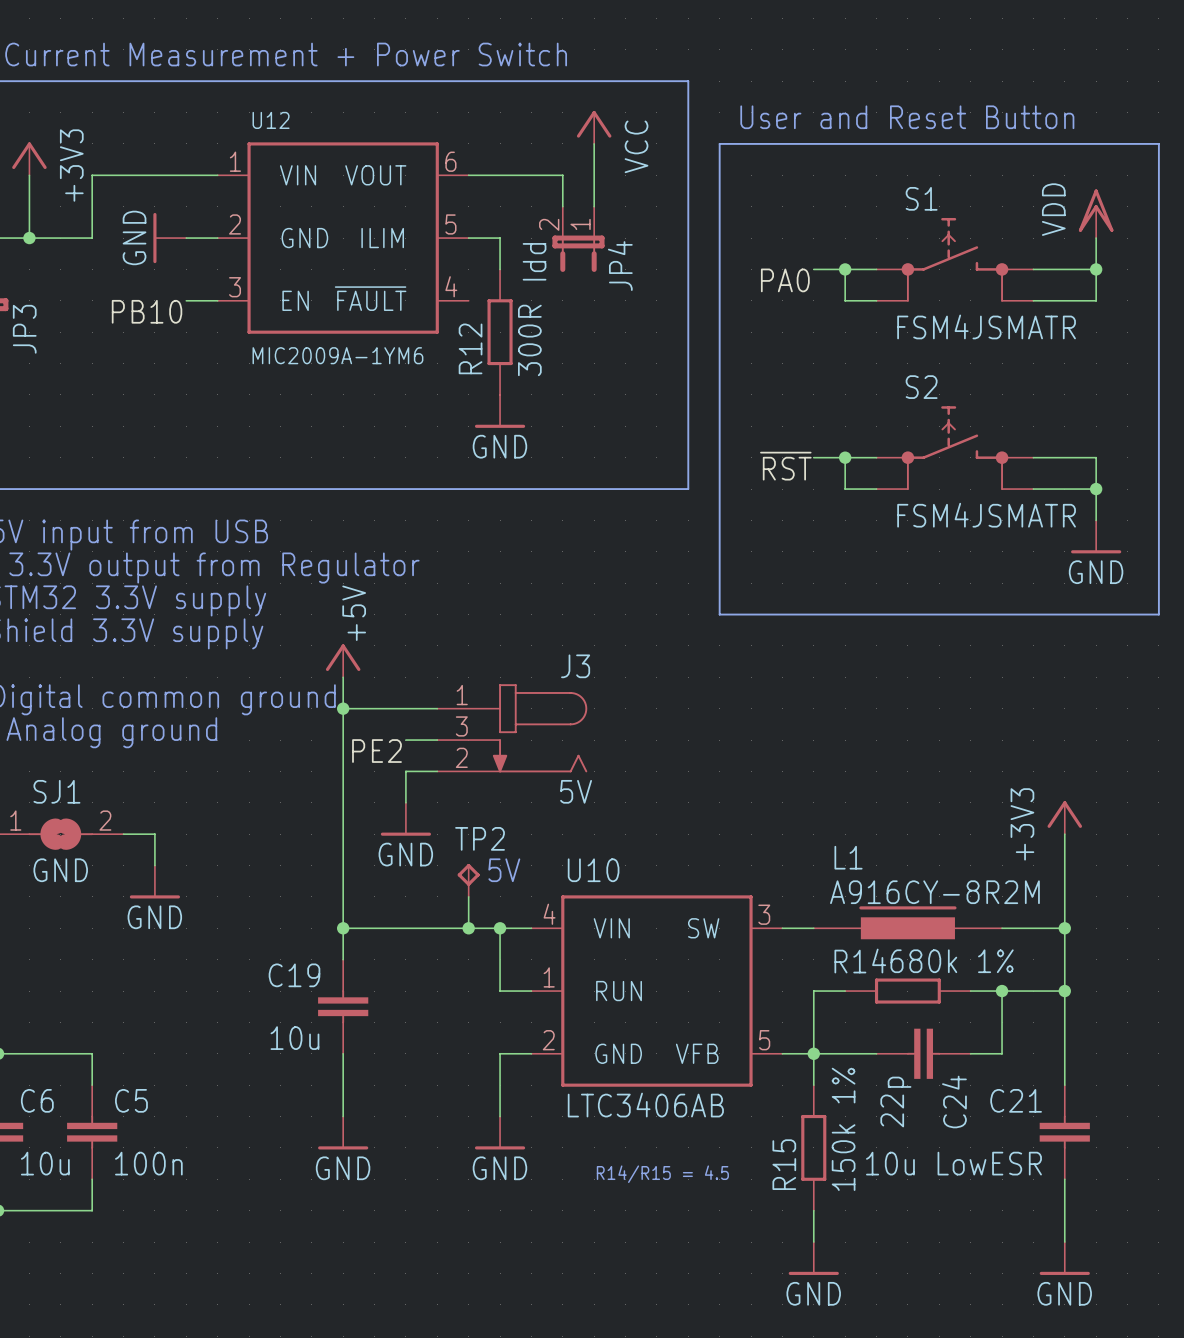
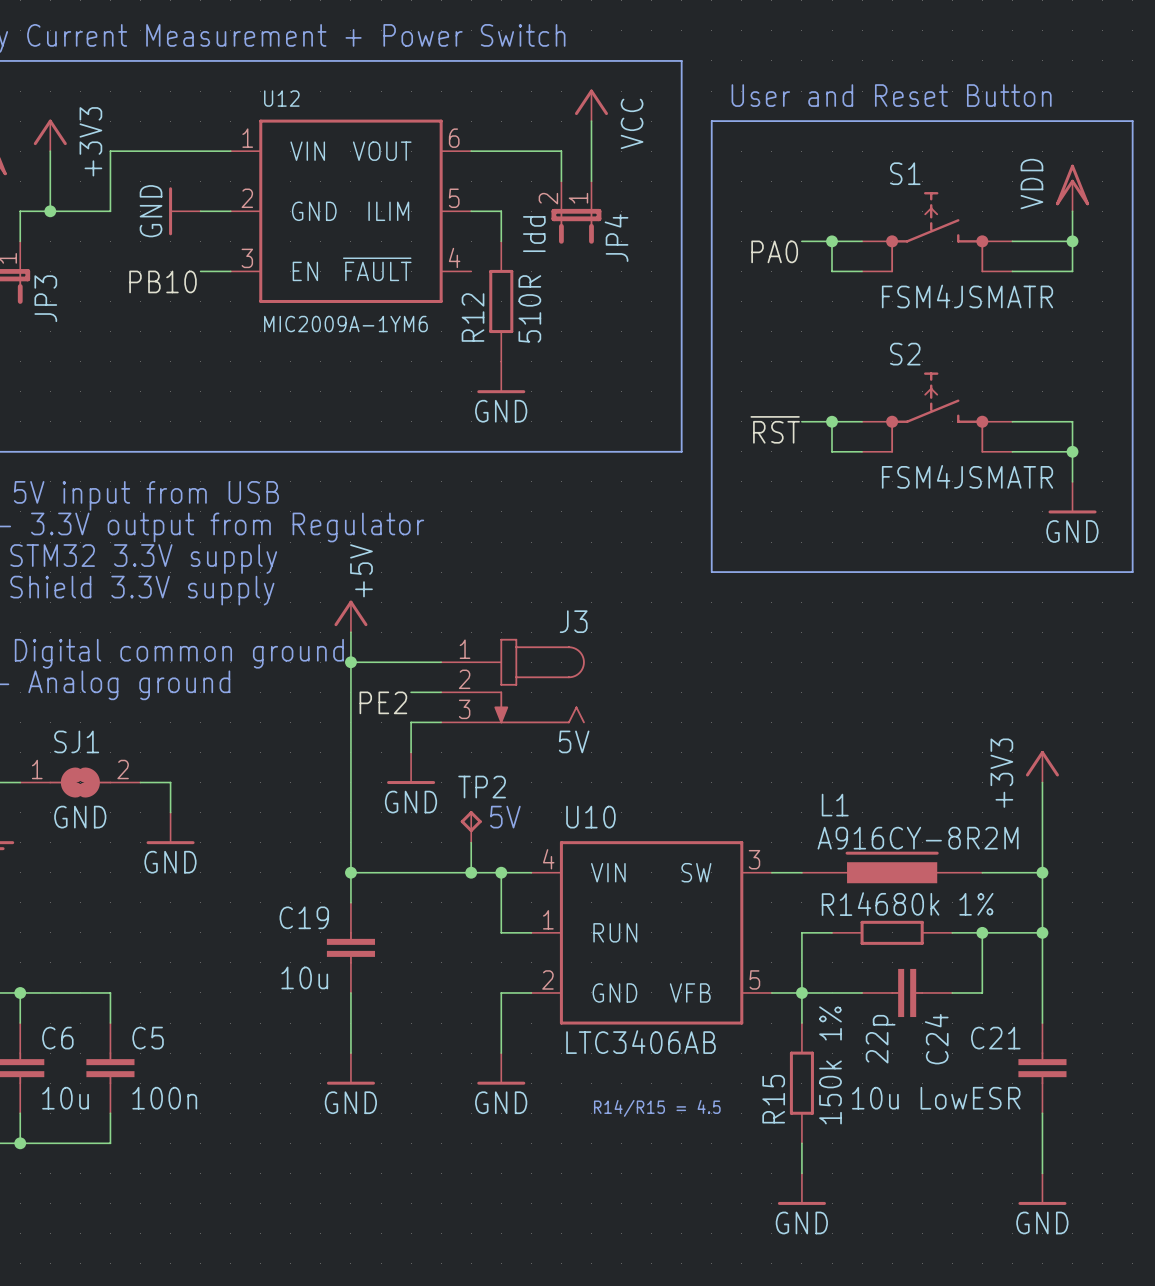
R12 value: 300R (529, 340) -> 510R (529, 308)
J3 pin number: 3 (461, 726) -> 2 (464, 679)
J3 pin number: 2 (461, 757) -> 3 (464, 709)

